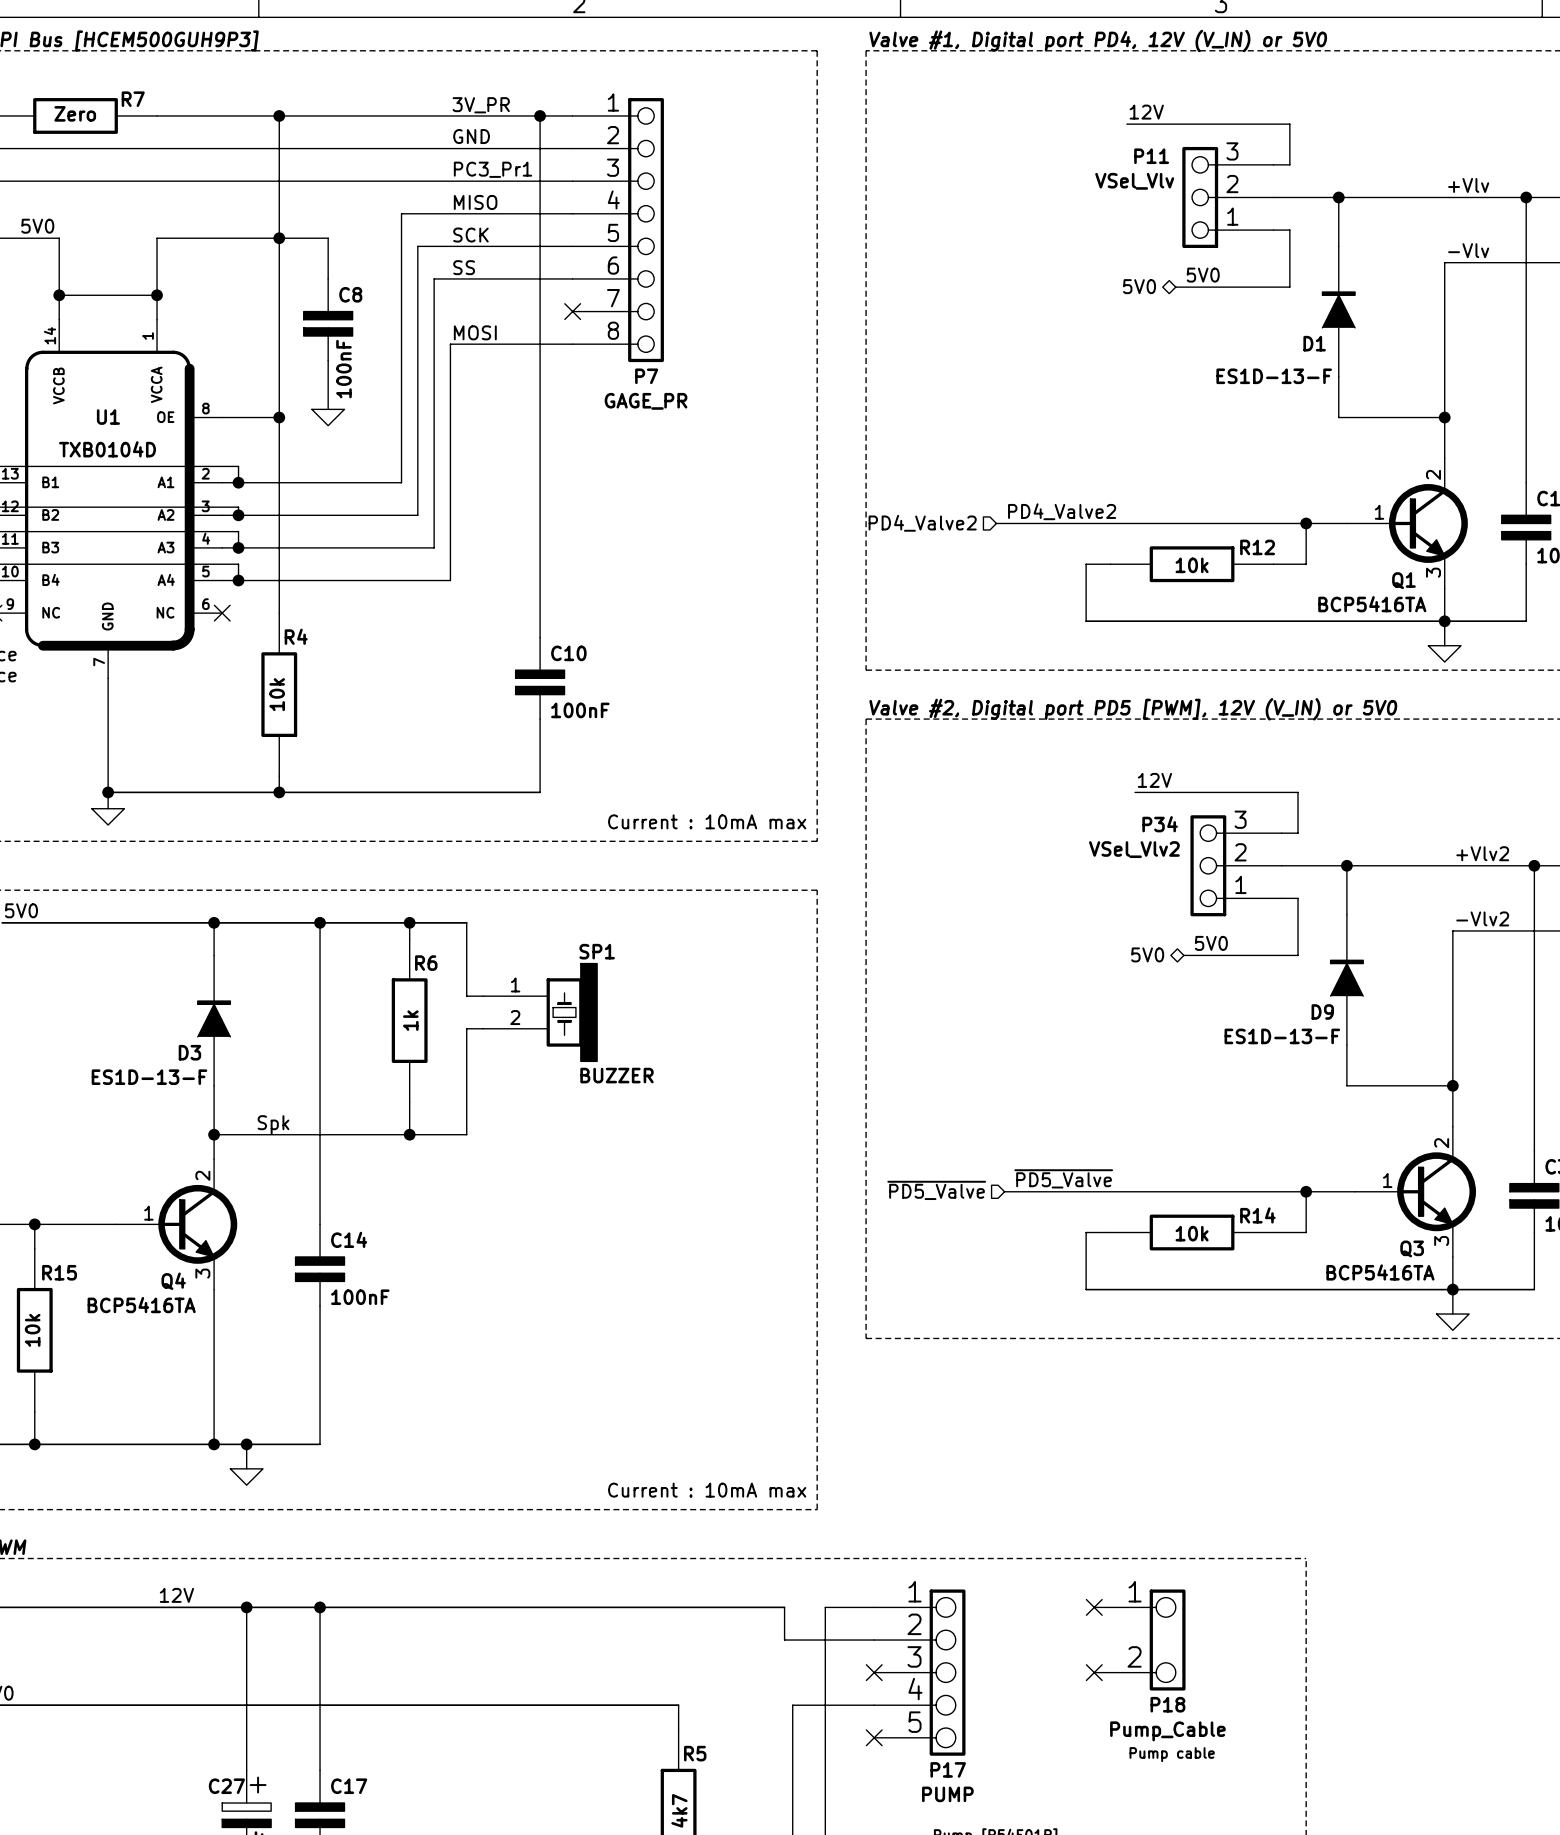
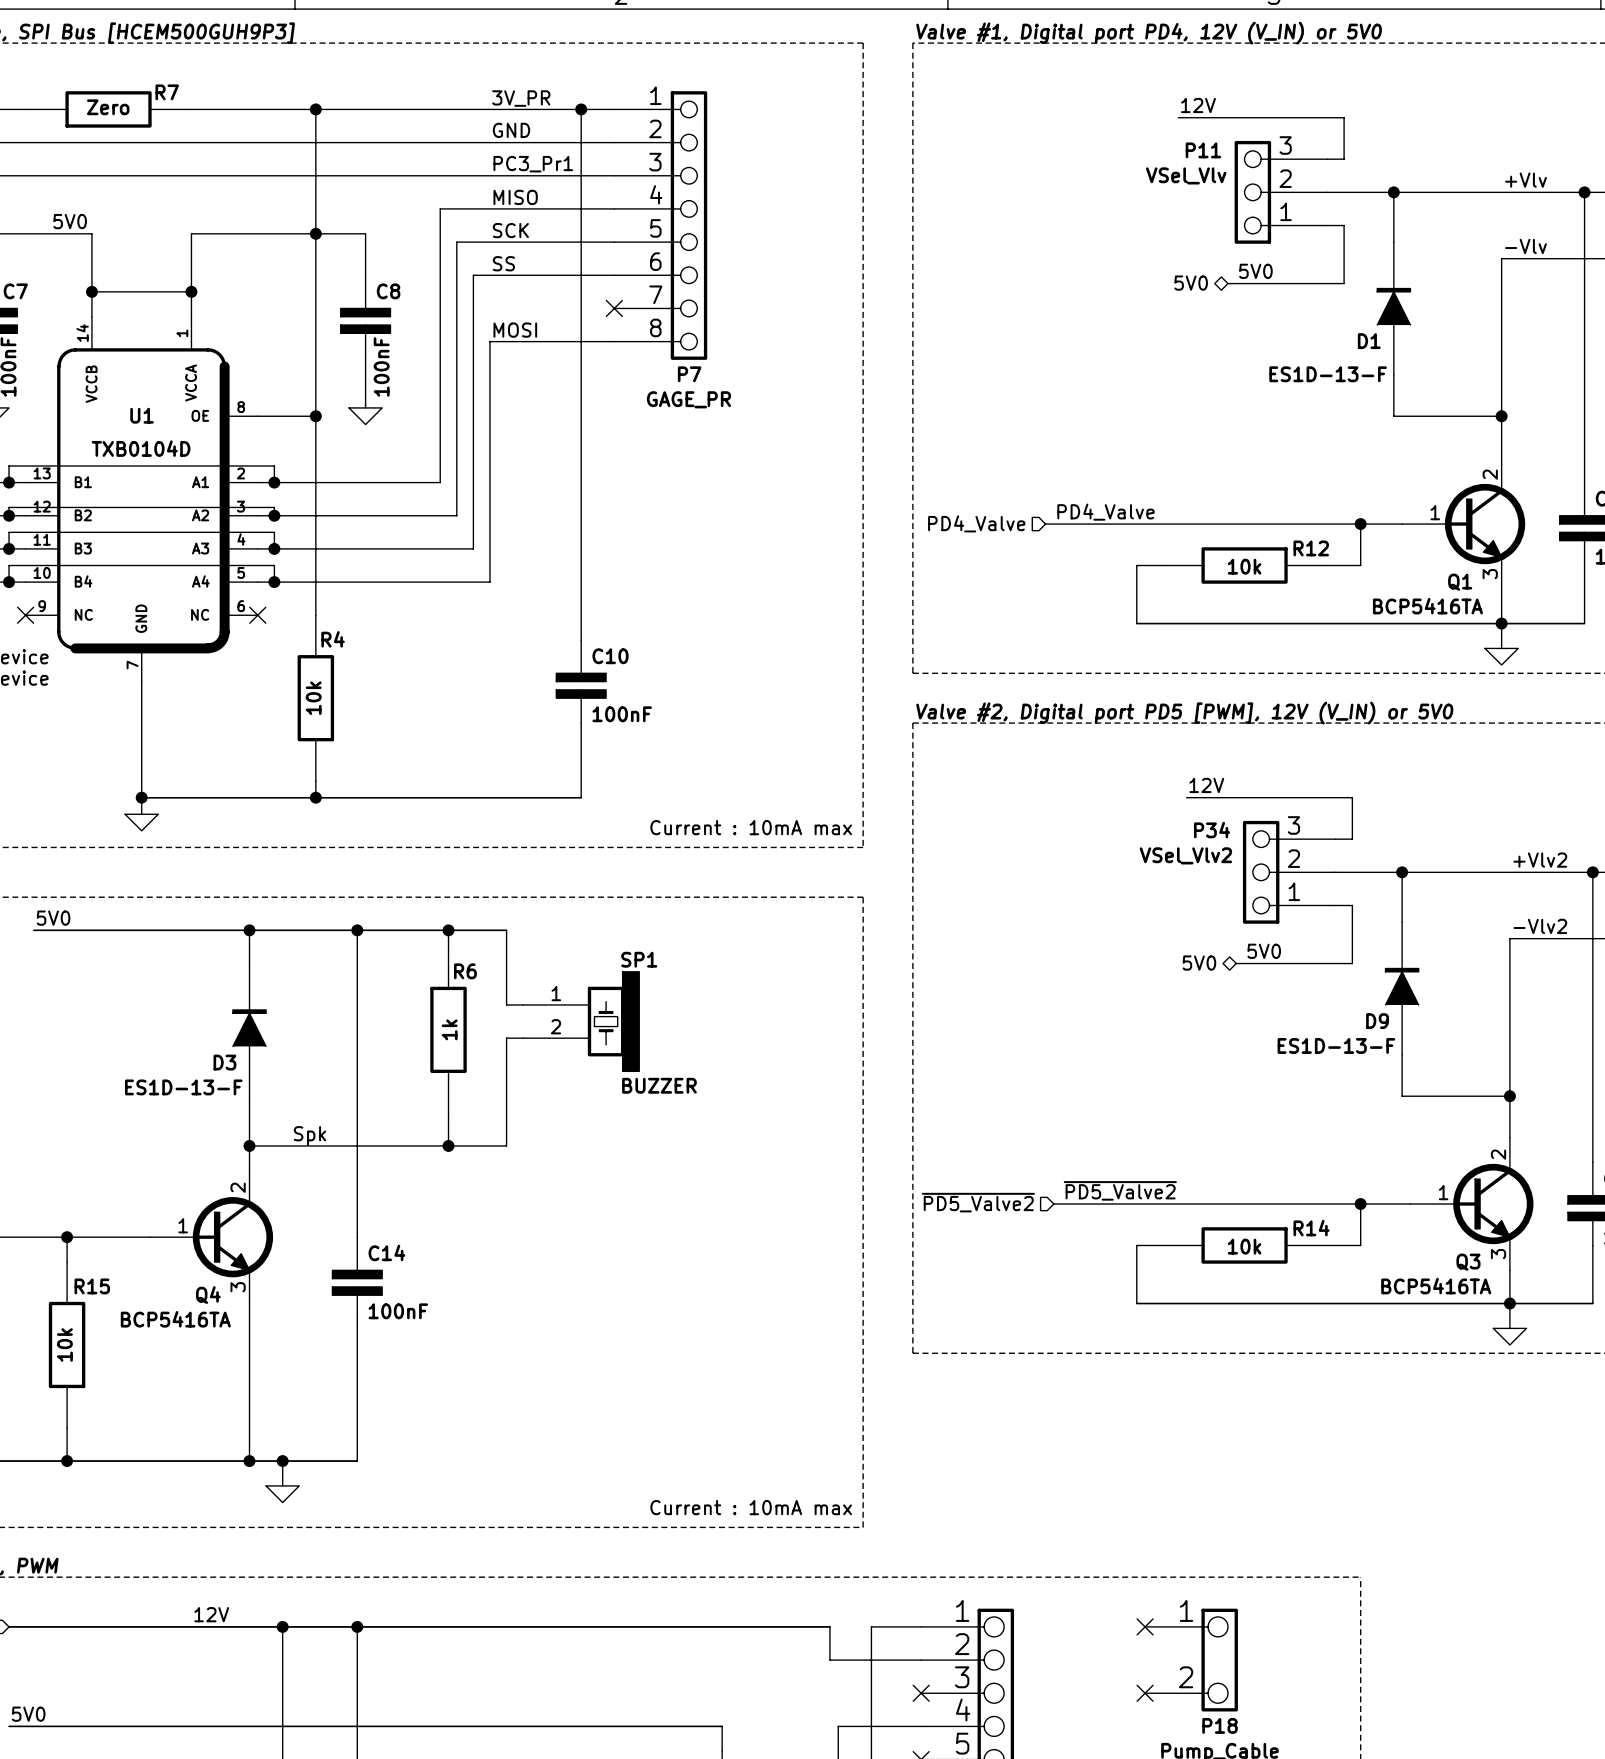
label: PD4_Valve2 (1062, 511) -> PD4_Valve (1106, 512)
hierarchical label: PD4_Valve2 (922, 523) -> PD4_Valve (976, 523)
label: ~{PD5_Valve} (1063, 1178) -> ~{PD5_Valve2} (1120, 1190)
hierarchical label: ~{PD5_Valve} (936, 1190) -> ~{PD5_Valve2} (978, 1202)

